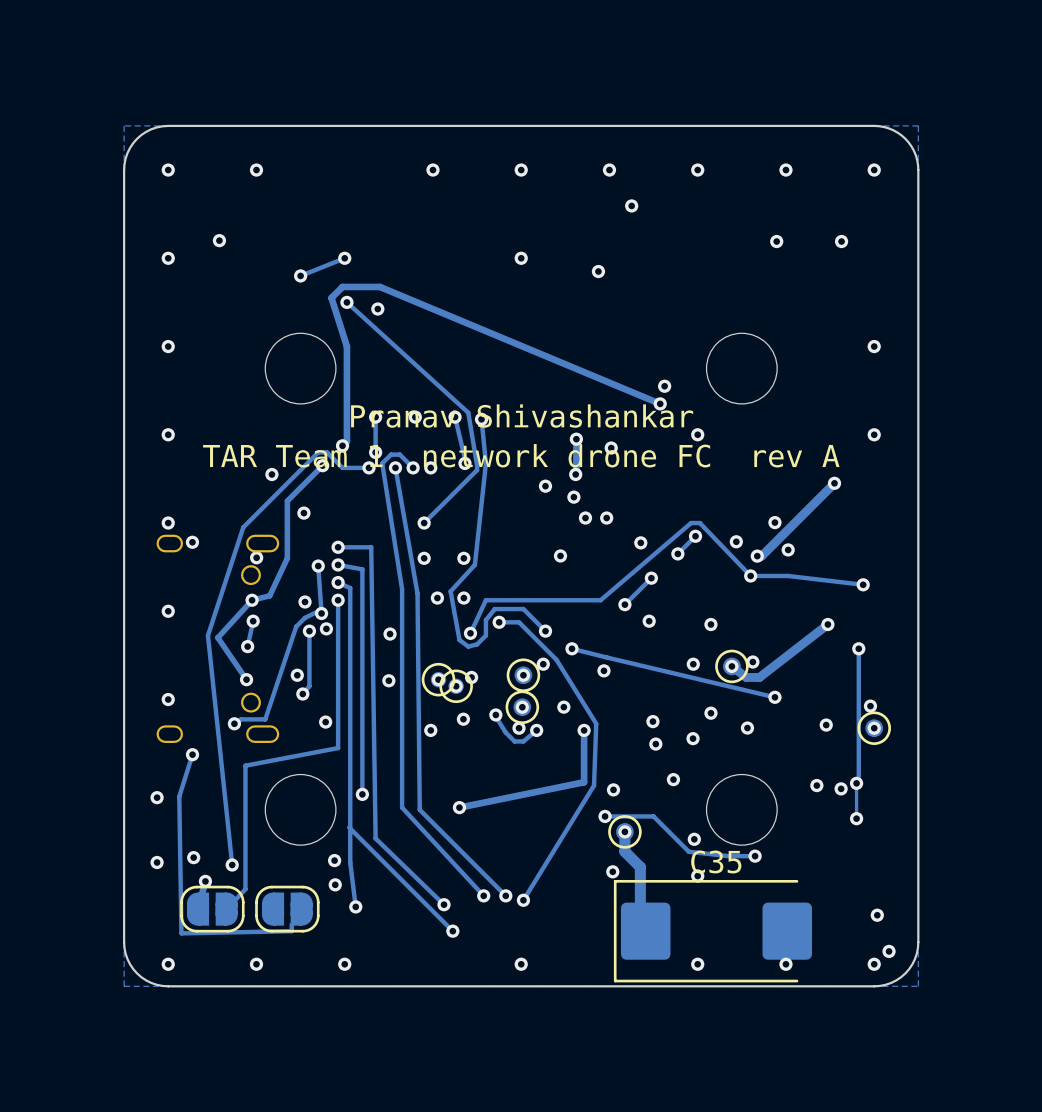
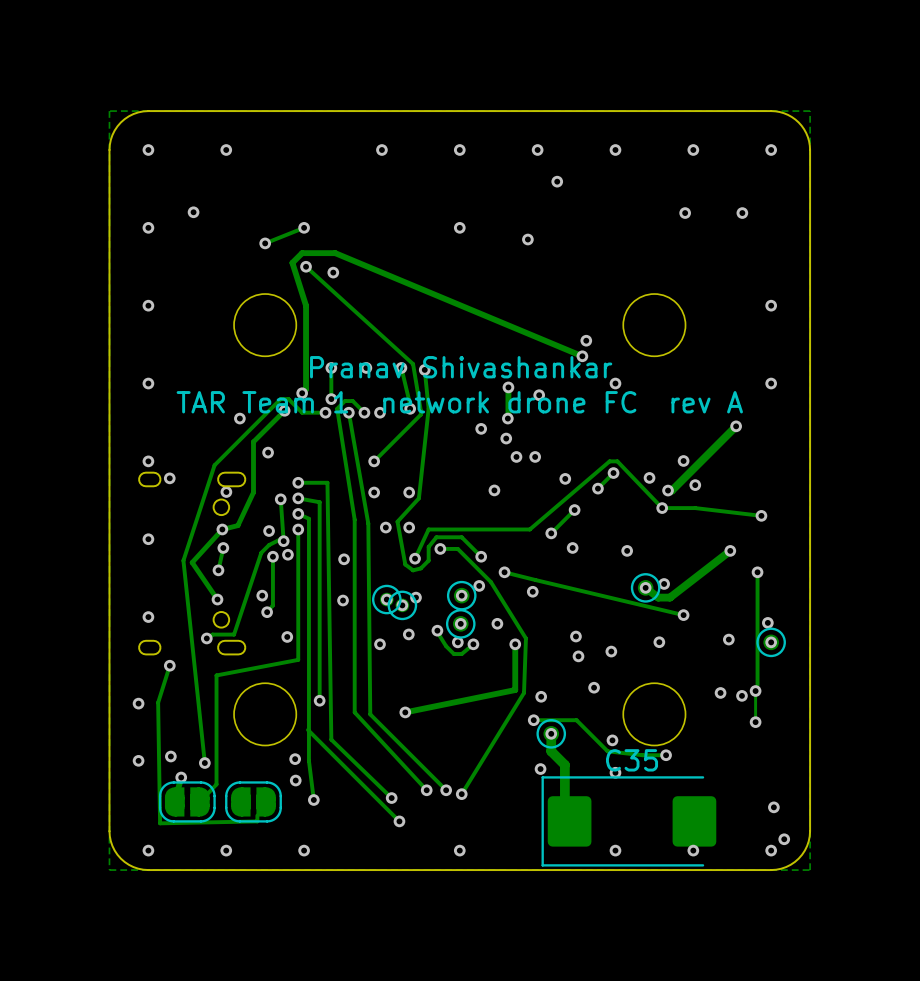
via: (693, 664) -> none
via: (710, 713) -> none

